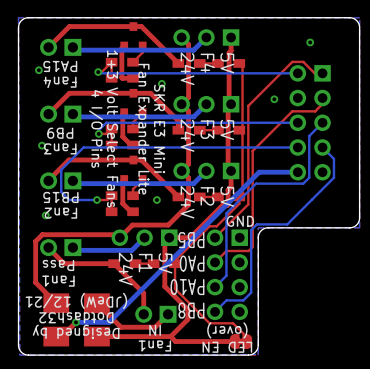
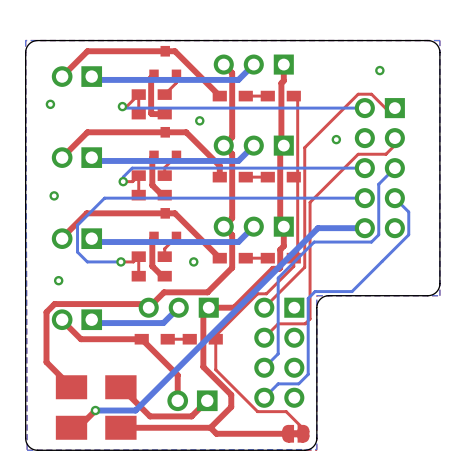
text: F4 (207, 63) -> none
text: 5V (227, 63) -> none
text: PA15 (60, 66) -> none
text: 24V (187, 68) -> none
text: Fan4 (60, 82) -> none
text: 4 I/O Pins (95, 128) -> none
text: 1+3 Volt Select Fans (112, 128) -> none
text: SKR E3 Mini (159, 128) -> none
text: Fan Expander Lite (142, 129) -> none
text: F3 (207, 129) -> none
text: 5V (227, 129) -> none
text: PB9 (60, 133) -> none
text: 24V (187, 135) -> none
text: Fan3 (60, 148) -> none
text: F2 (207, 196) -> none
text: 5V (227, 196) -> none
text: PB15 (60, 197) -> none
text: 24V (187, 202) -> none
text: Fan2 (60, 213) -> none
text: GND (240, 221) -> none
text: PB5 (191, 240) -> none
text: F1 (145, 263) -> none
text: 5V (165, 263) -> none
text: PA0 (192, 263) -> none
text: Pass (58, 265) -> none
text: 24V (126, 269) -> none
text: Fan1 (58, 281) -> none
text: PA10 (187, 287) -> none
text: (JDeW) 12/21 (76, 300) -> none
text: PB8 (191, 310) -> none
text: Dotdash32 (76, 317) -> none
text: IN (155, 330) -> none
text: (over) (227, 330) -> none
text: Designed by (76, 331) -> none
text: Fan1 (154, 346) -> none
text: LED EN (227, 347) -> none

